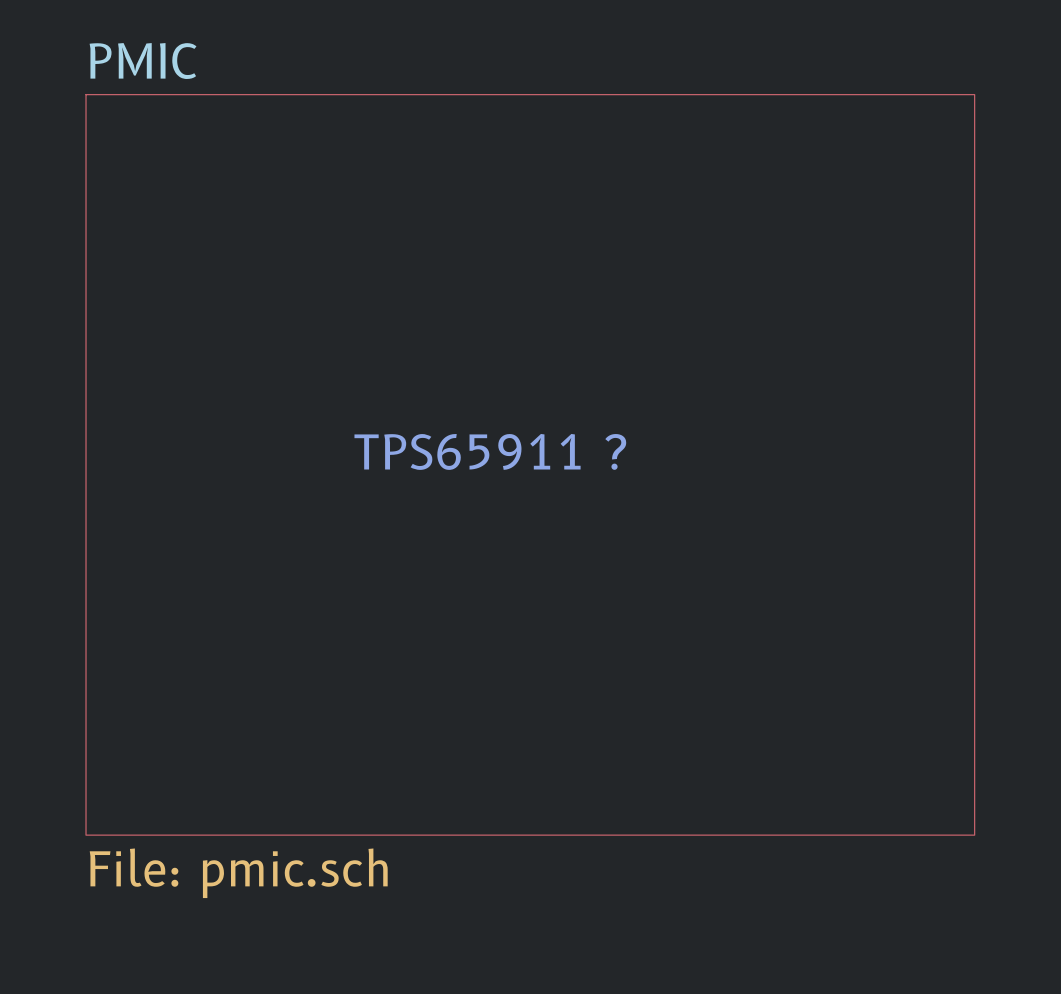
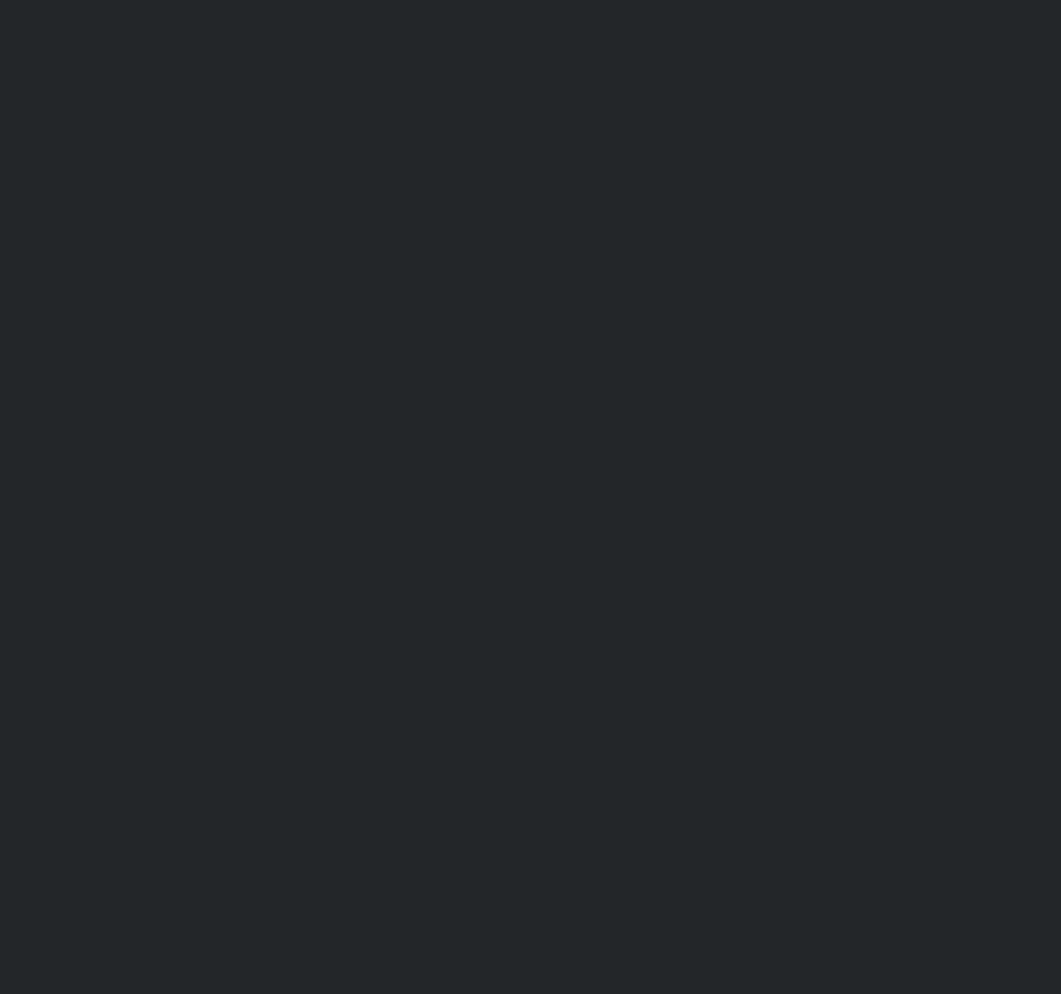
text: TPS65911 ? (490, 451) -> none
sheet PMIC: File: pmic.sch (530, 464) -> none

